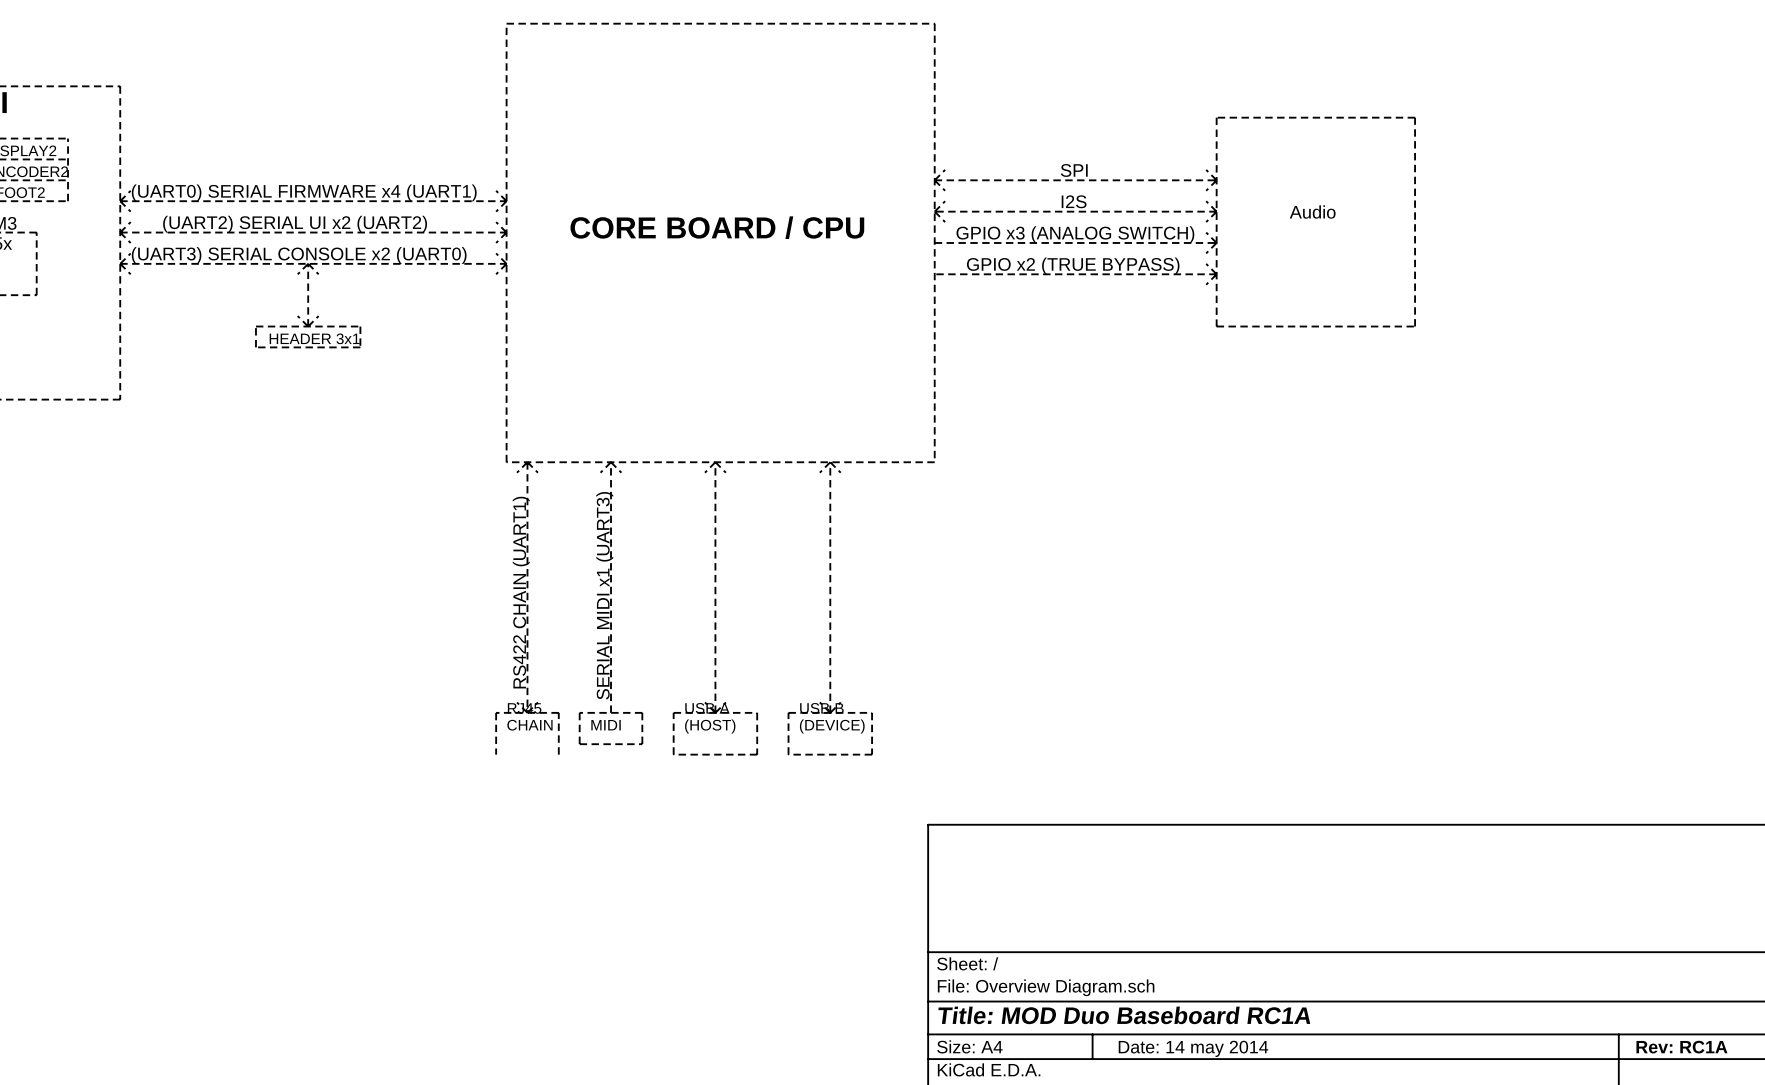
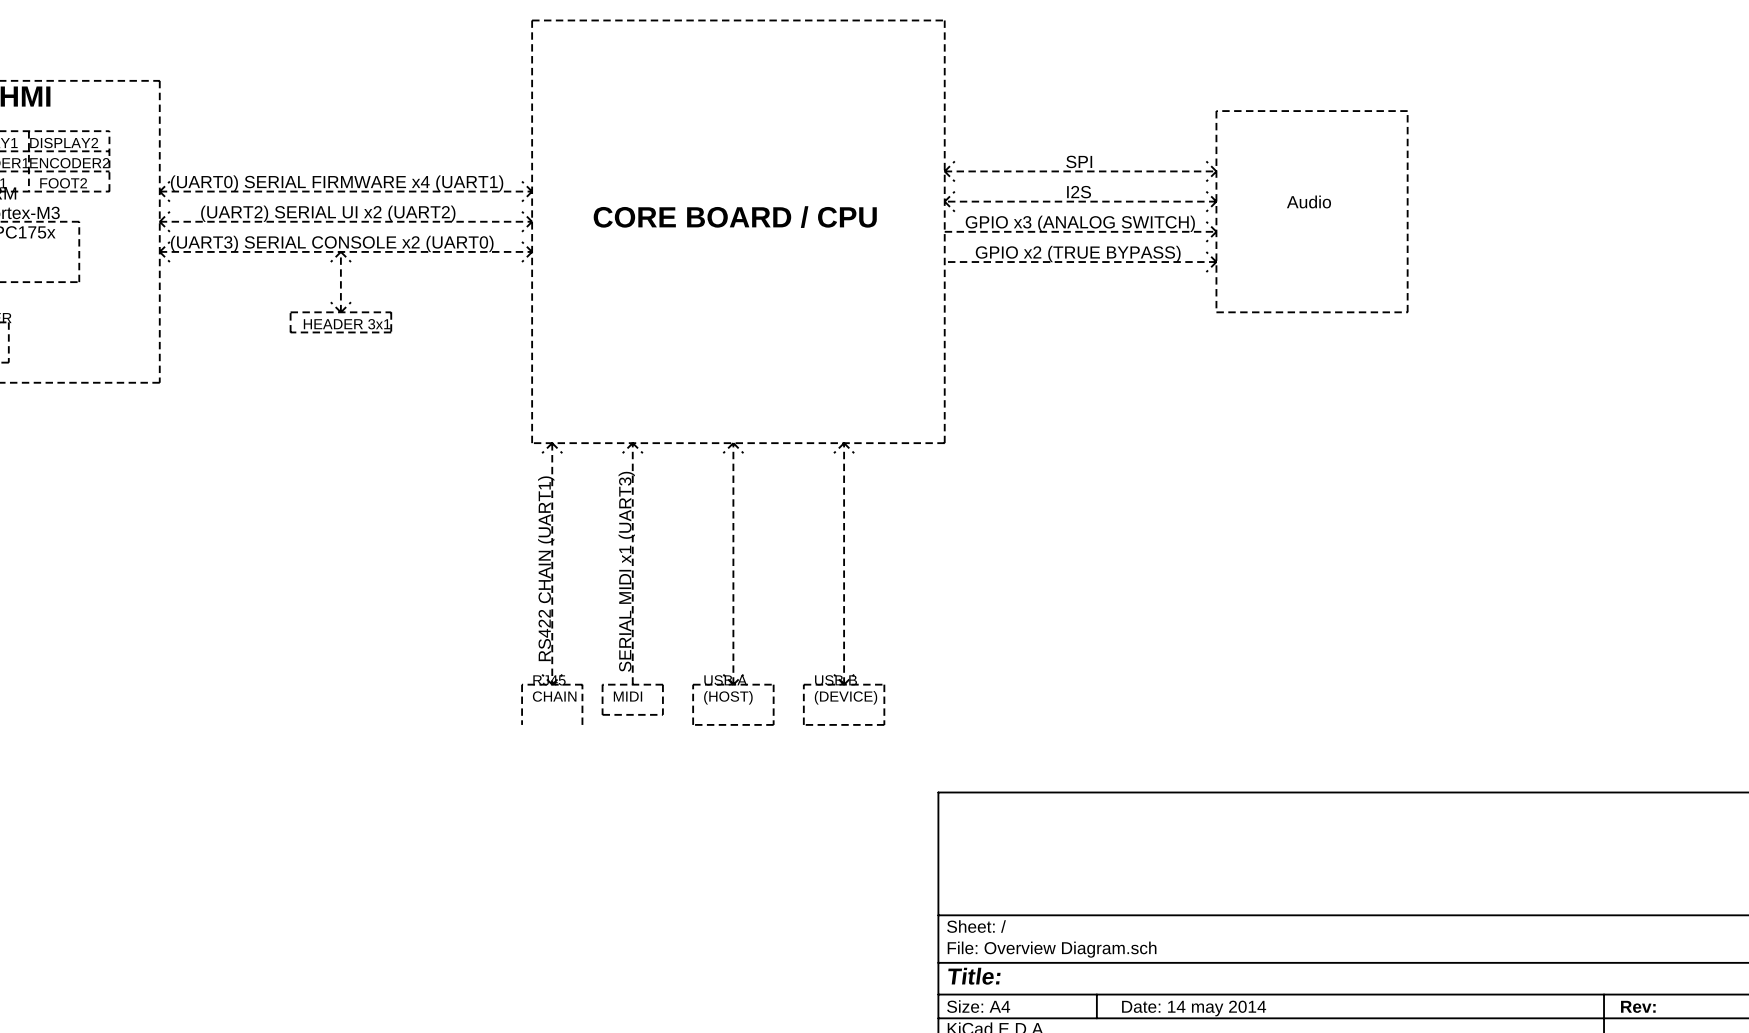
title block: Title: MOD Duo Baseboard RC1A (1124, 1015) -> Title: (974, 976)
title block: Rev: RC1A (1681, 1047) -> Rev: (1638, 1006)

